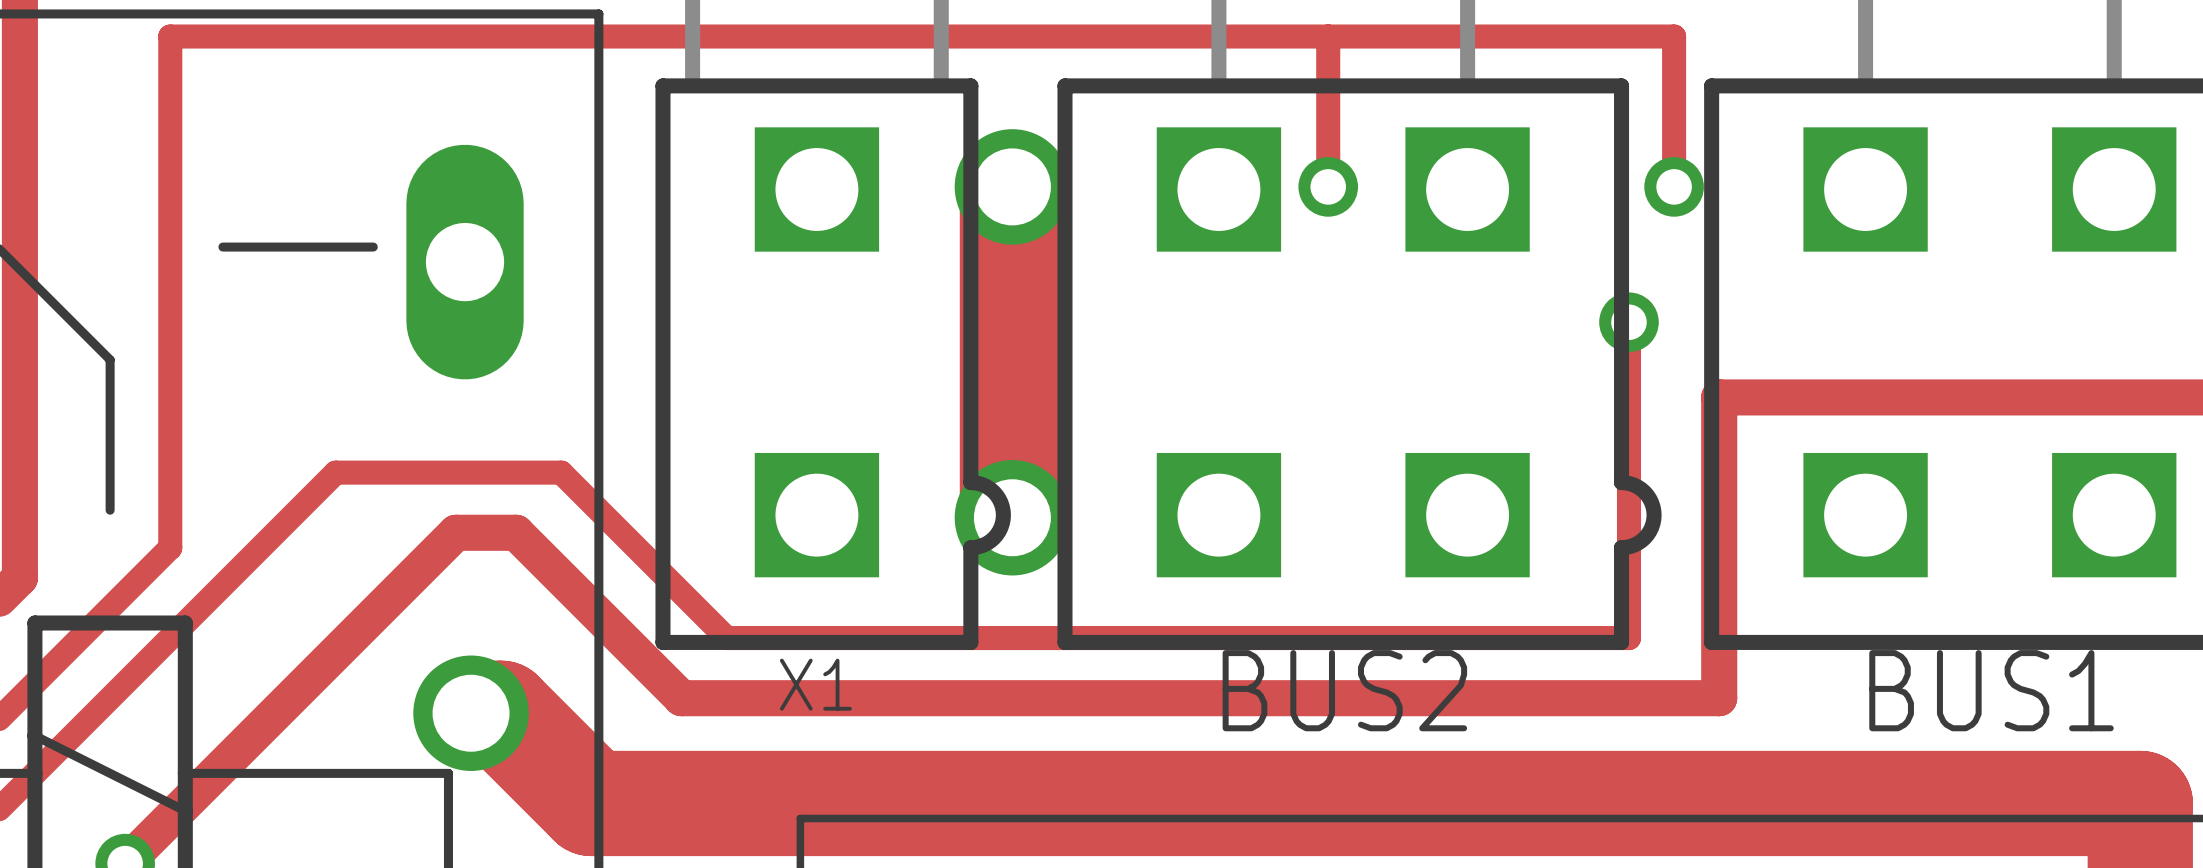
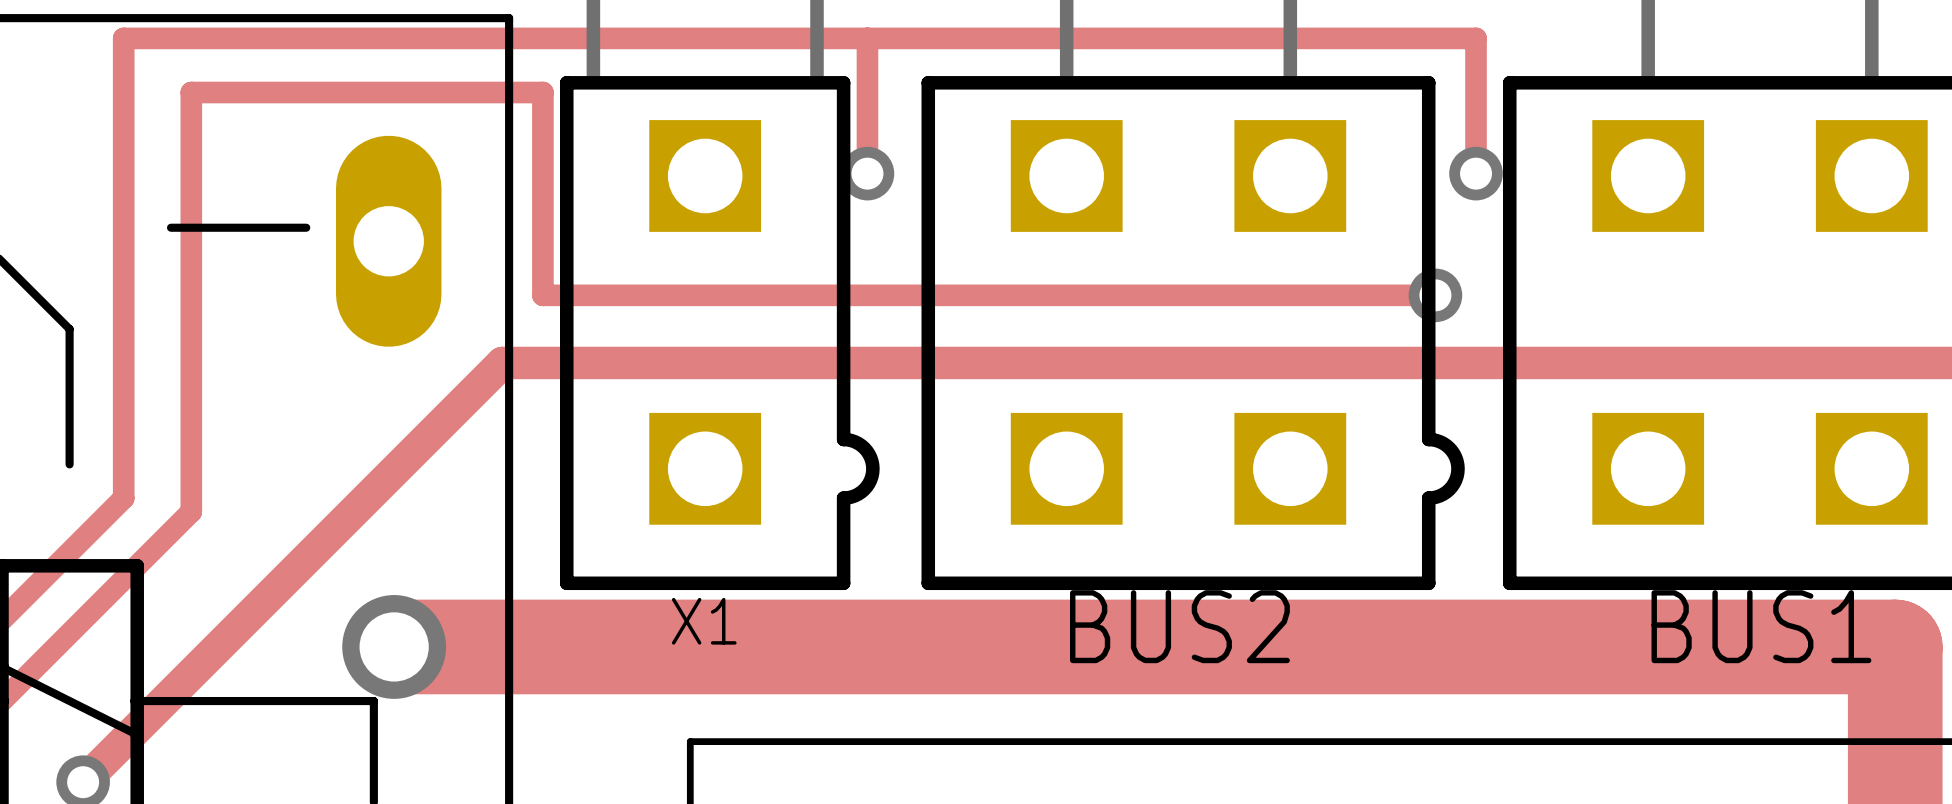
track: (1328, 36) (1328, 186) -> (867, 38) (867, 173)
track: (1012, 186) (1012, 517) -> none
via: (1012, 186) -> none
via position: (1328, 186) -> (867, 173)
track: (1628, 322) (1628, 638) (726, 638) (561, 472) (335, 472) (245, 562) -> (1435, 295) (542, 295) (542, 92) (191, 92) (191, 511)
track: (1719, 397) (1719, 698) (681, 698) (516, 532) (456, 532) -> (1516, 362) (502, 362) (380, 484)
via: (1012, 517) -> none
track: (501, 713) (591, 803) (2140, 803) -> (421, 646) (1895, 646) (1895, 728)

